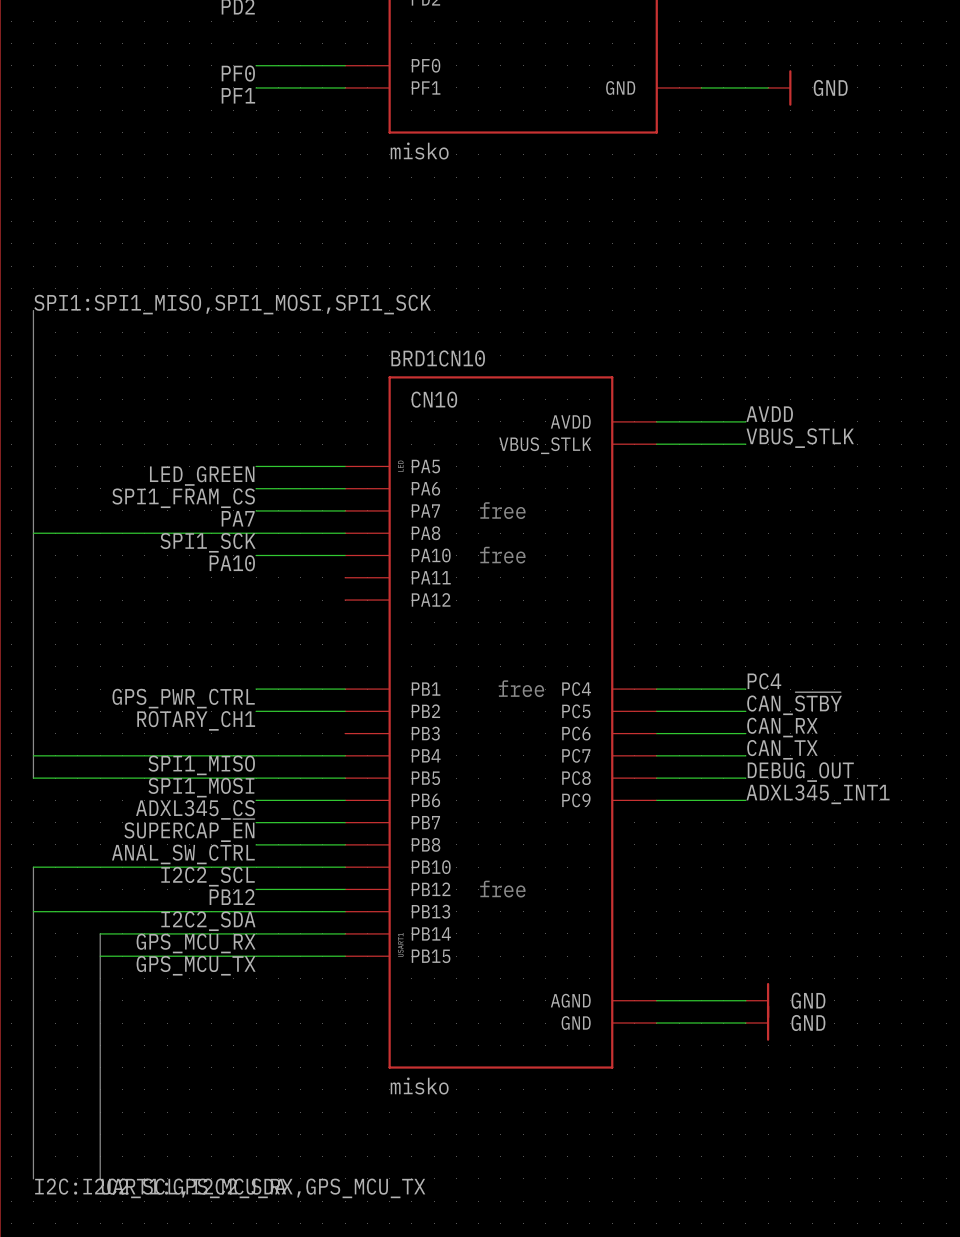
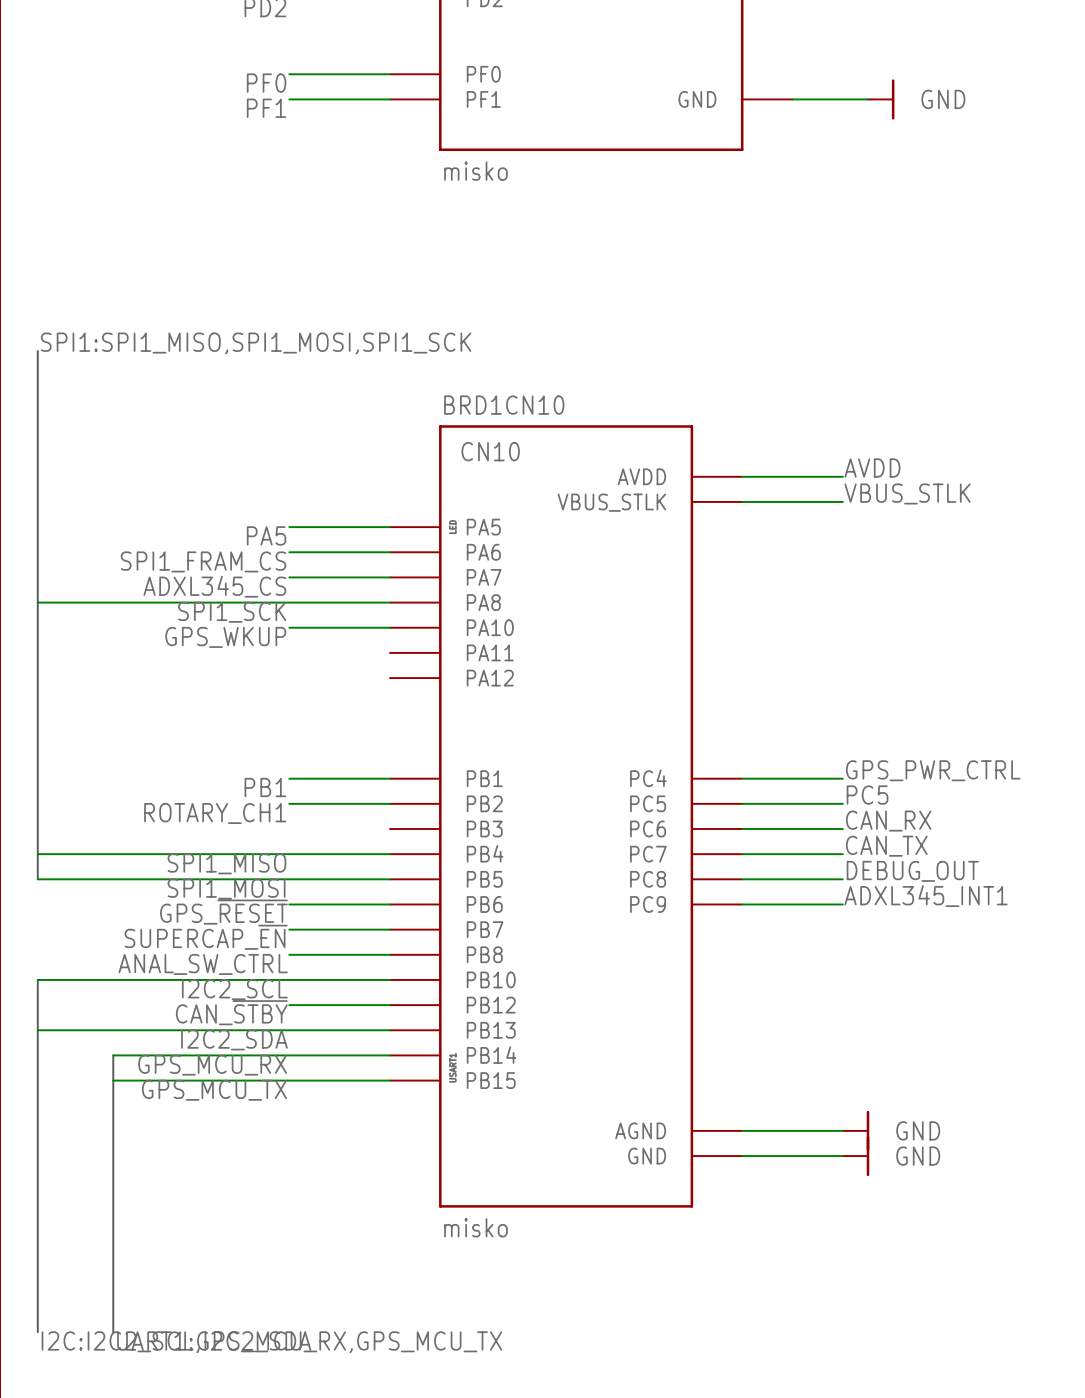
label: LED_GREEN (202, 475) -> PA5 (266, 535)
text: free (502, 510) -> none
label: PA7 (238, 518) -> ADXL345_CS (214, 586)
text: free (502, 555) -> none
label: PA10 (232, 563) -> GPS_WKUP (225, 637)
label: PC4 (764, 681) -> GPS_PWR_CTRL (933, 770)
text: free (521, 688) -> none
label: GPS_PWR_CTRL (183, 698) -> PB1 (265, 787)
label: CAN_~{STBY} (794, 703) -> PC5 (867, 795)
label: ADXL345_CS (195, 809) -> GPS_~{RESET} (223, 912)
text: free (502, 889) -> none
label: PB12 (232, 897) -> CAN_~{STBY} (231, 1012)

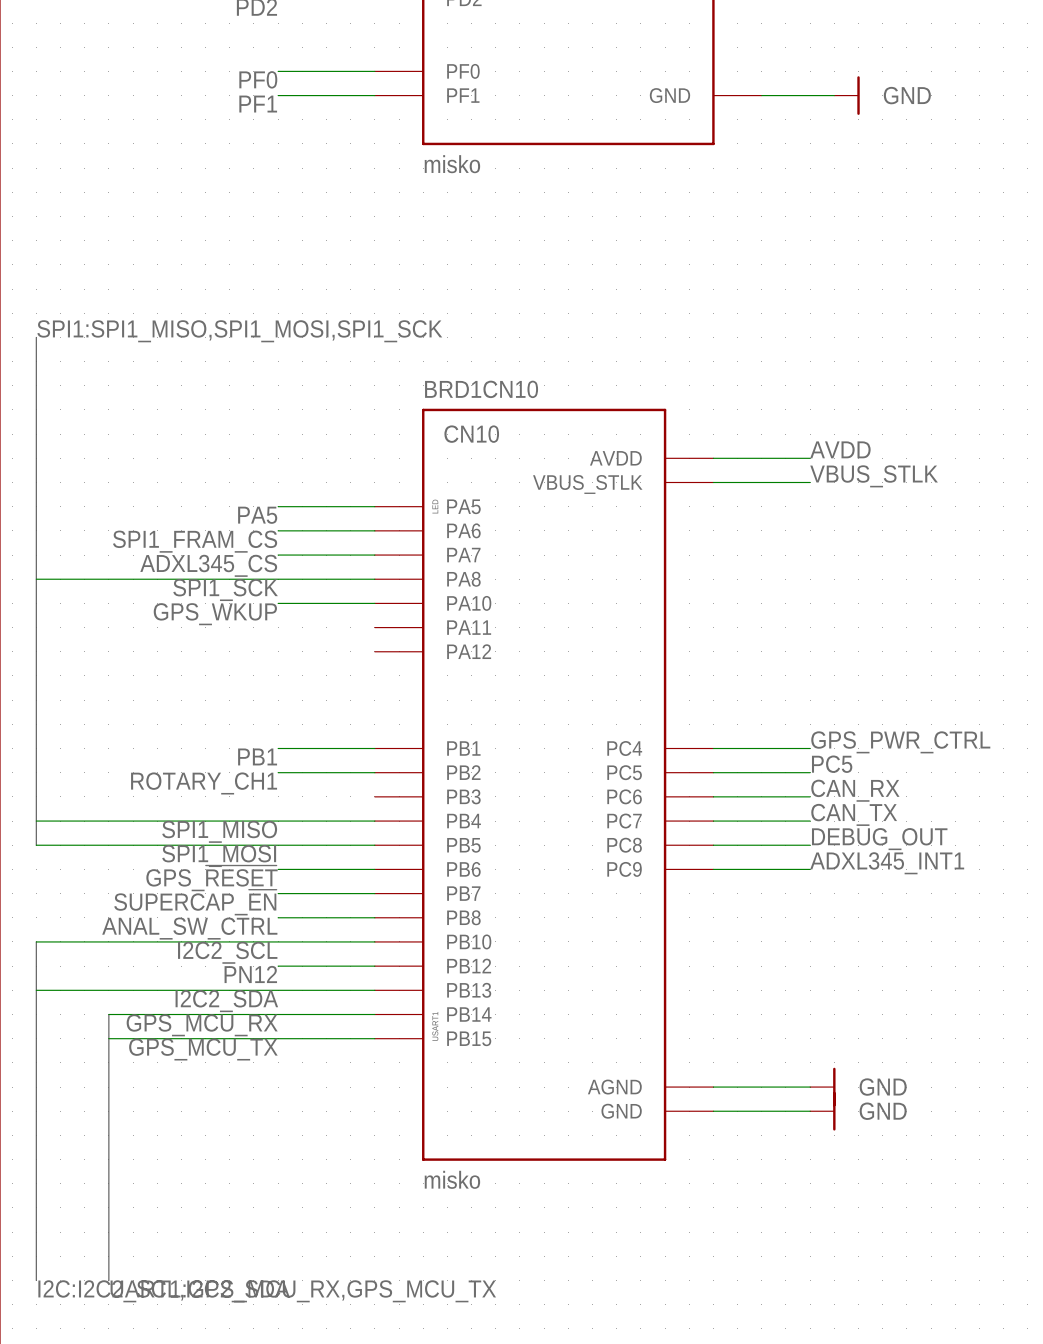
label: CAN_~{STBY} (231, 1012) -> PN12 (250, 974)

